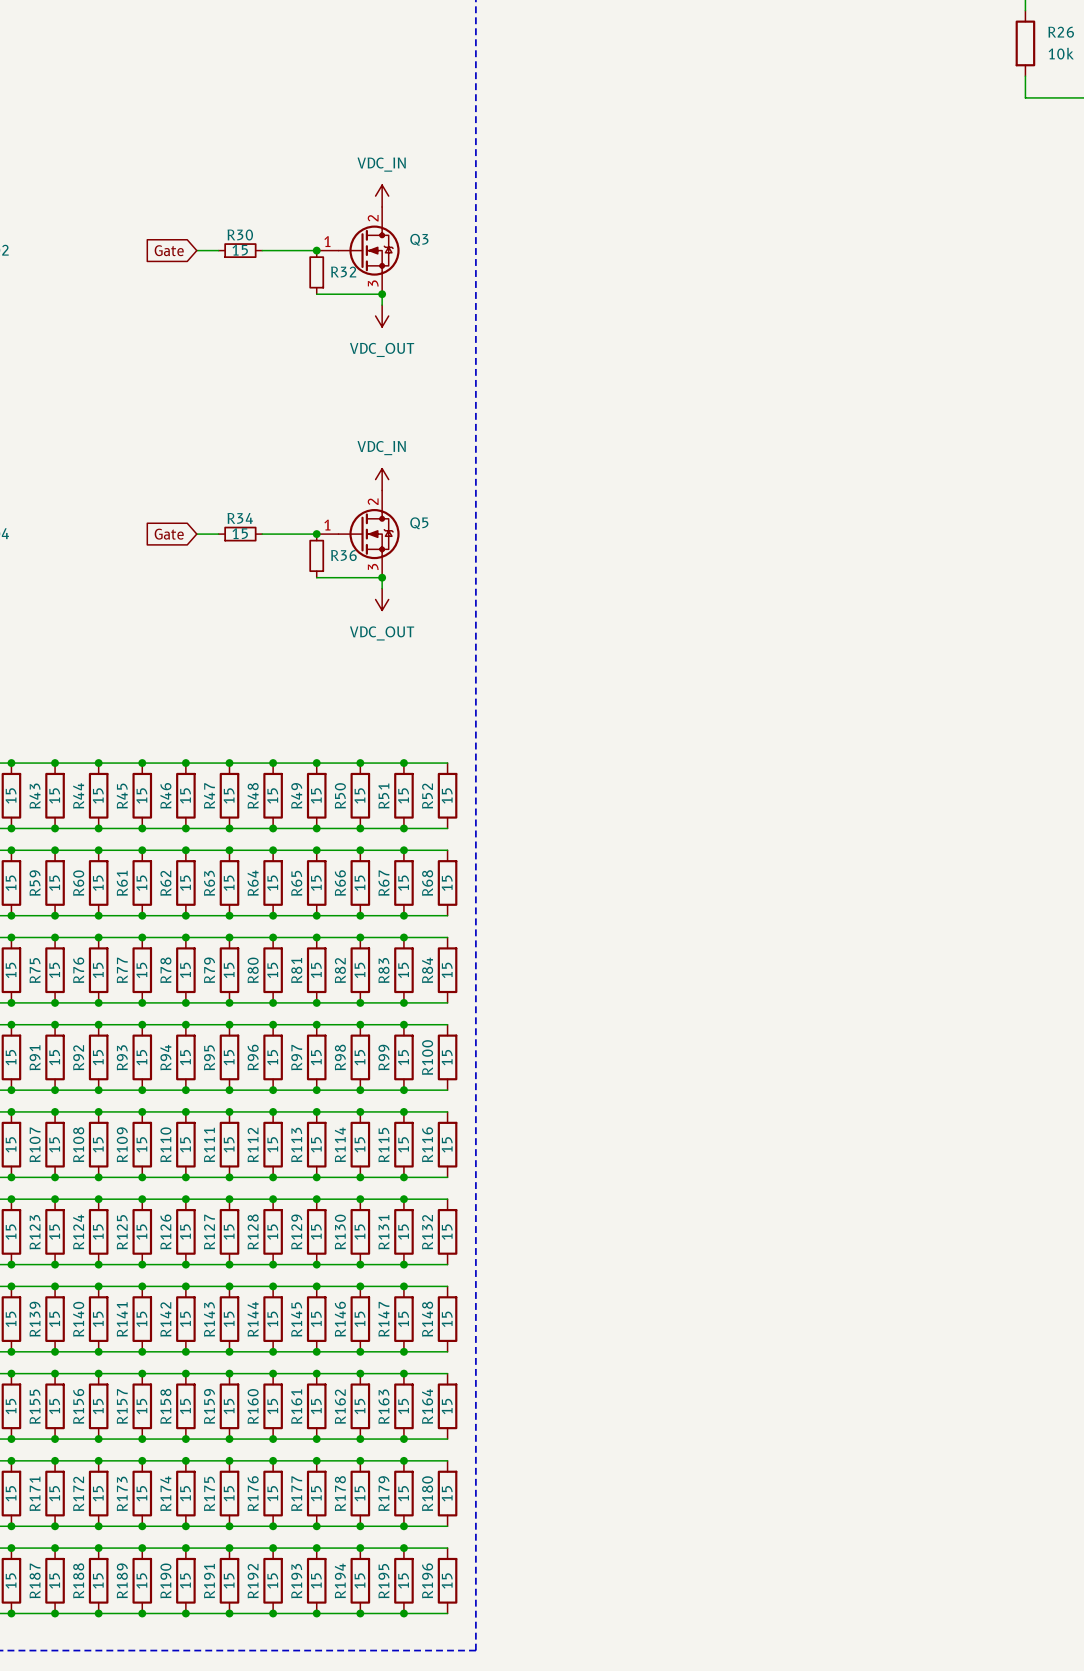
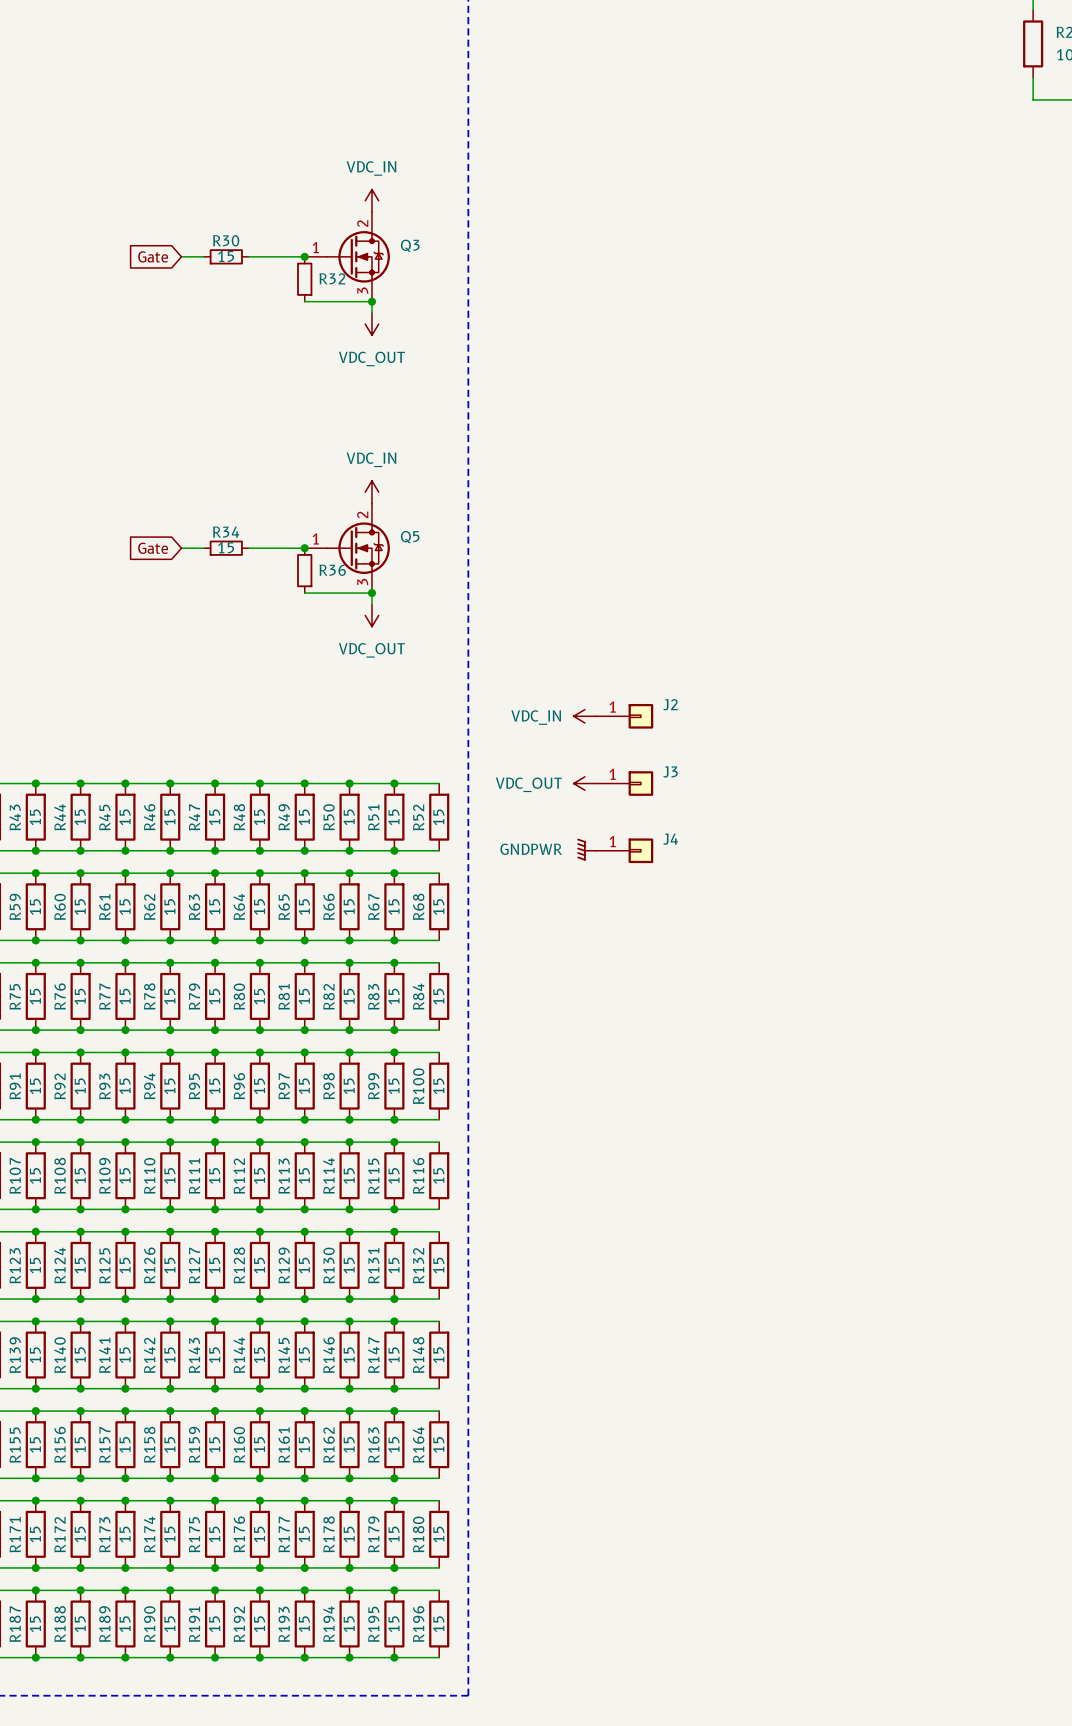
power symbol: none -> VDC_IN (584, 716)
J2: none -> (624, 716)
power symbol: none -> VDC_OUT (584, 783)
J3: none -> (624, 783)
power symbol: none -> GNDPWR (586, 849)
J4: none -> (624, 850)

